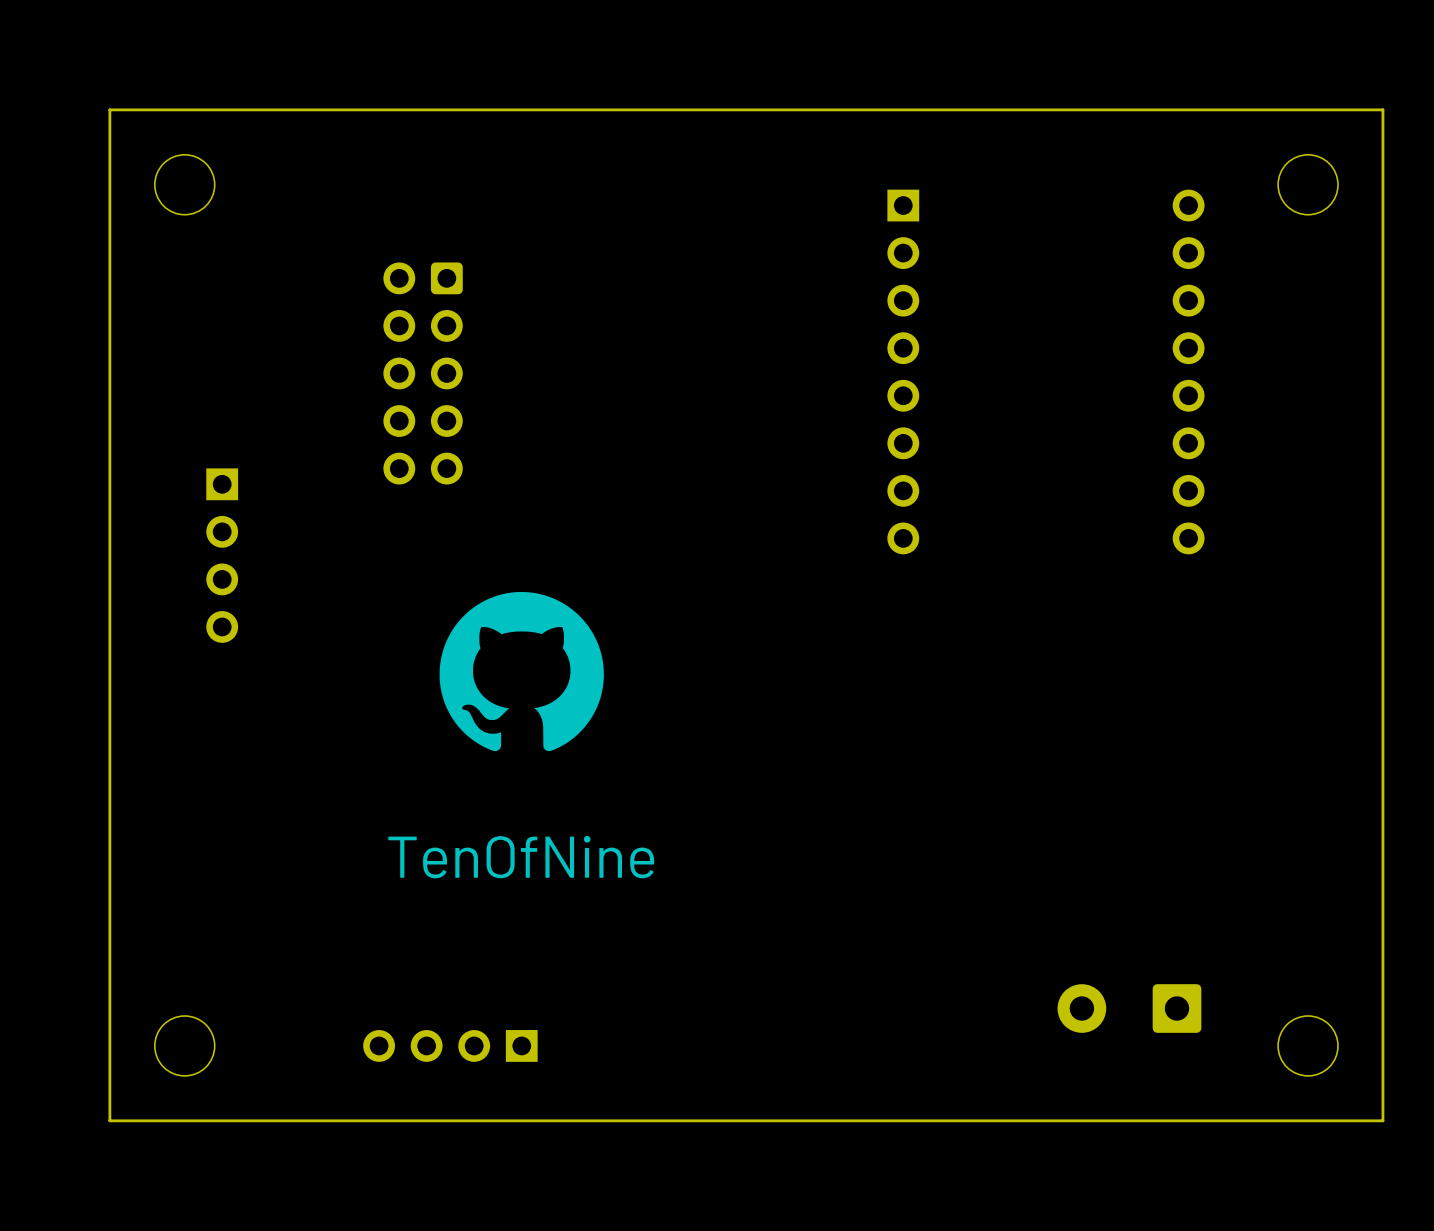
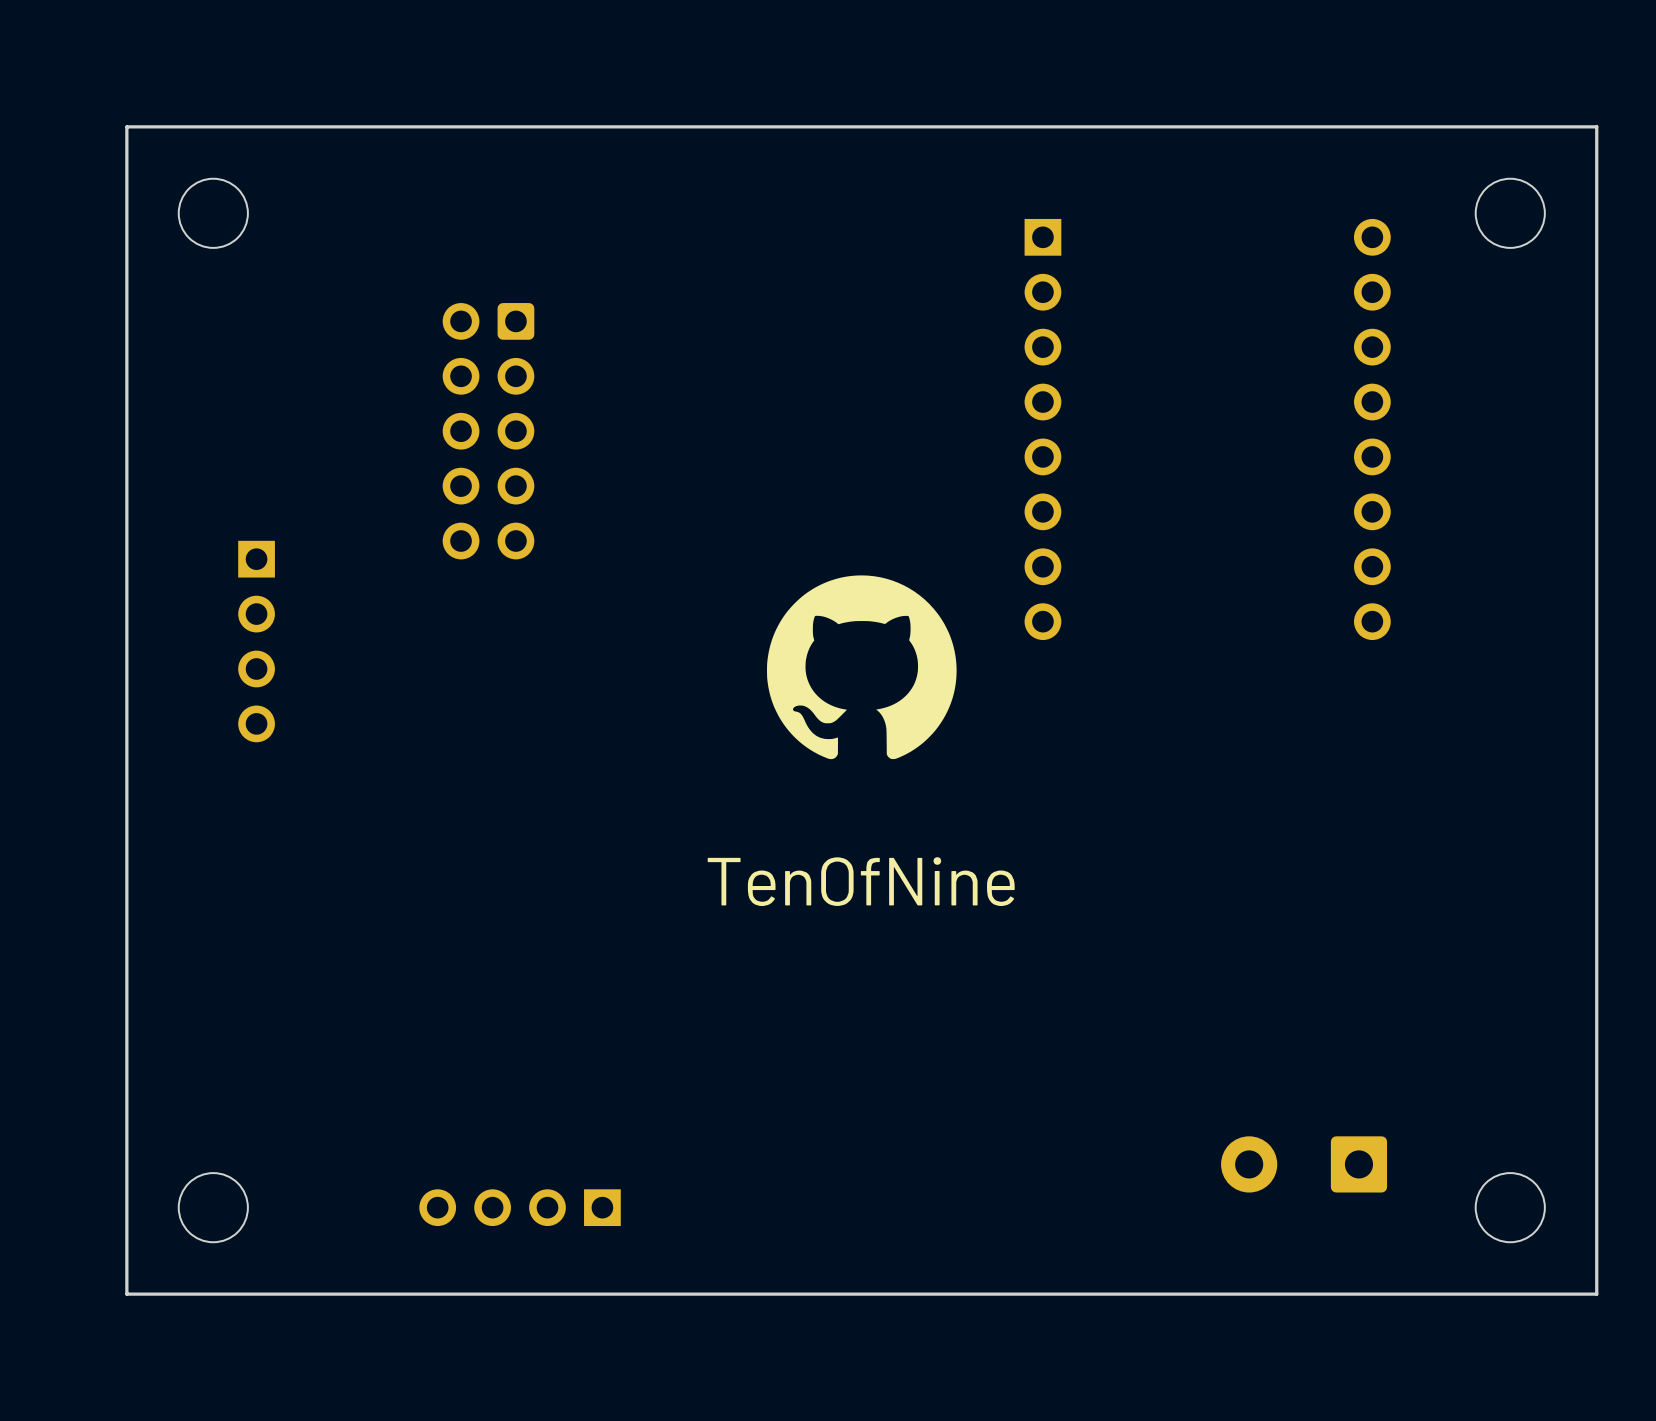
drawing position: (521, 671) -> (861, 667)
text position: TenOfNine (521, 857) -> TenOfNine (861, 881)

